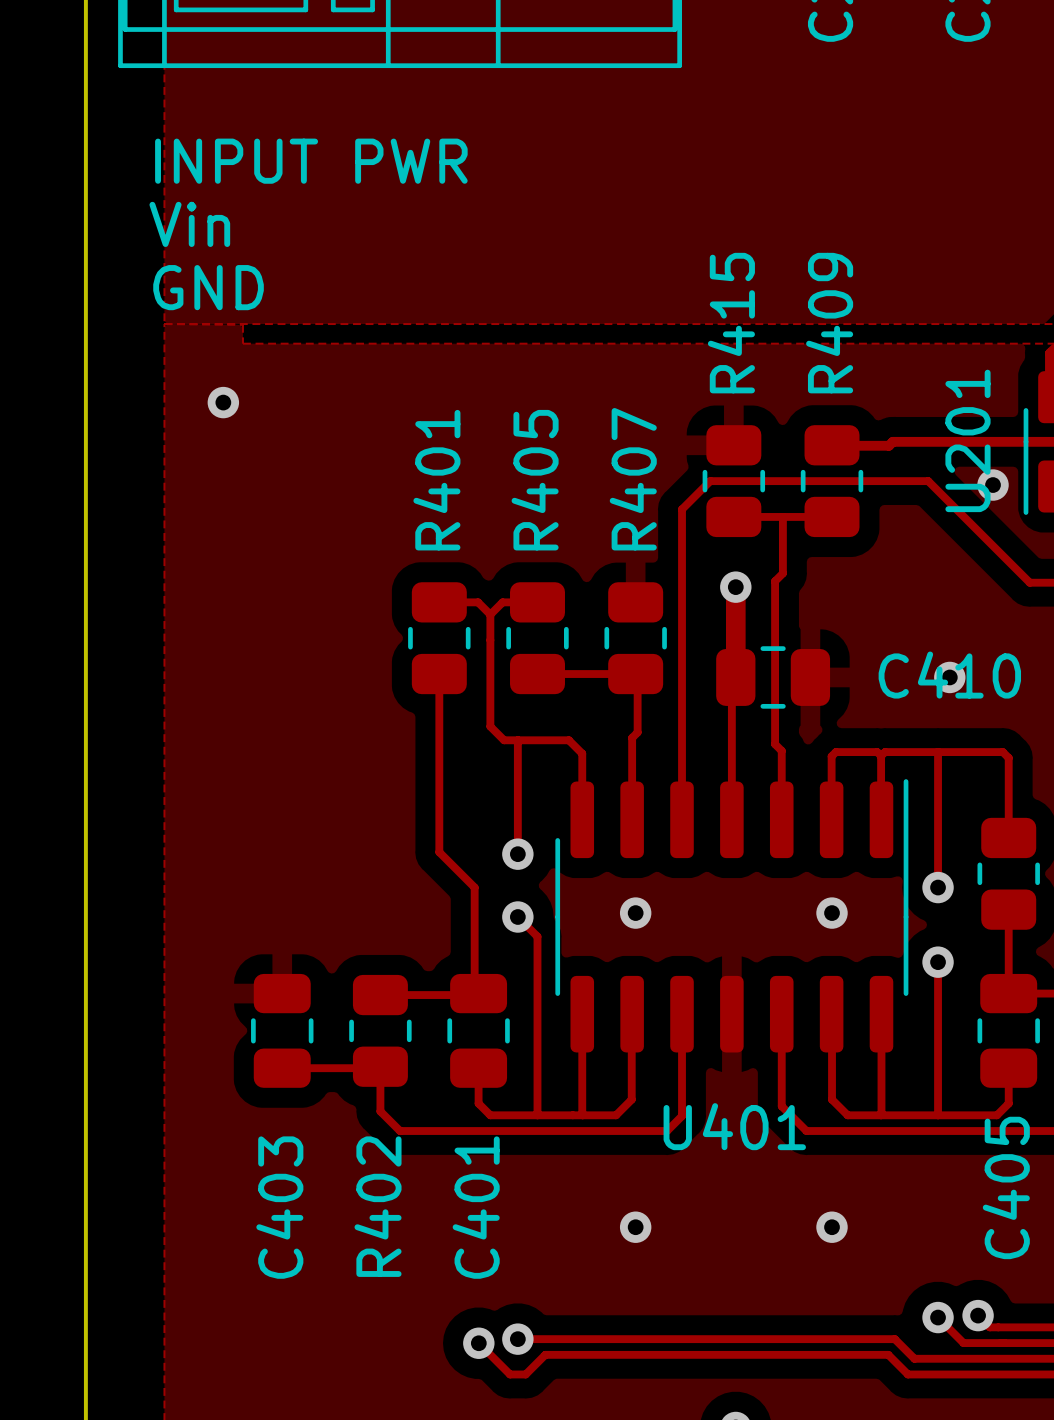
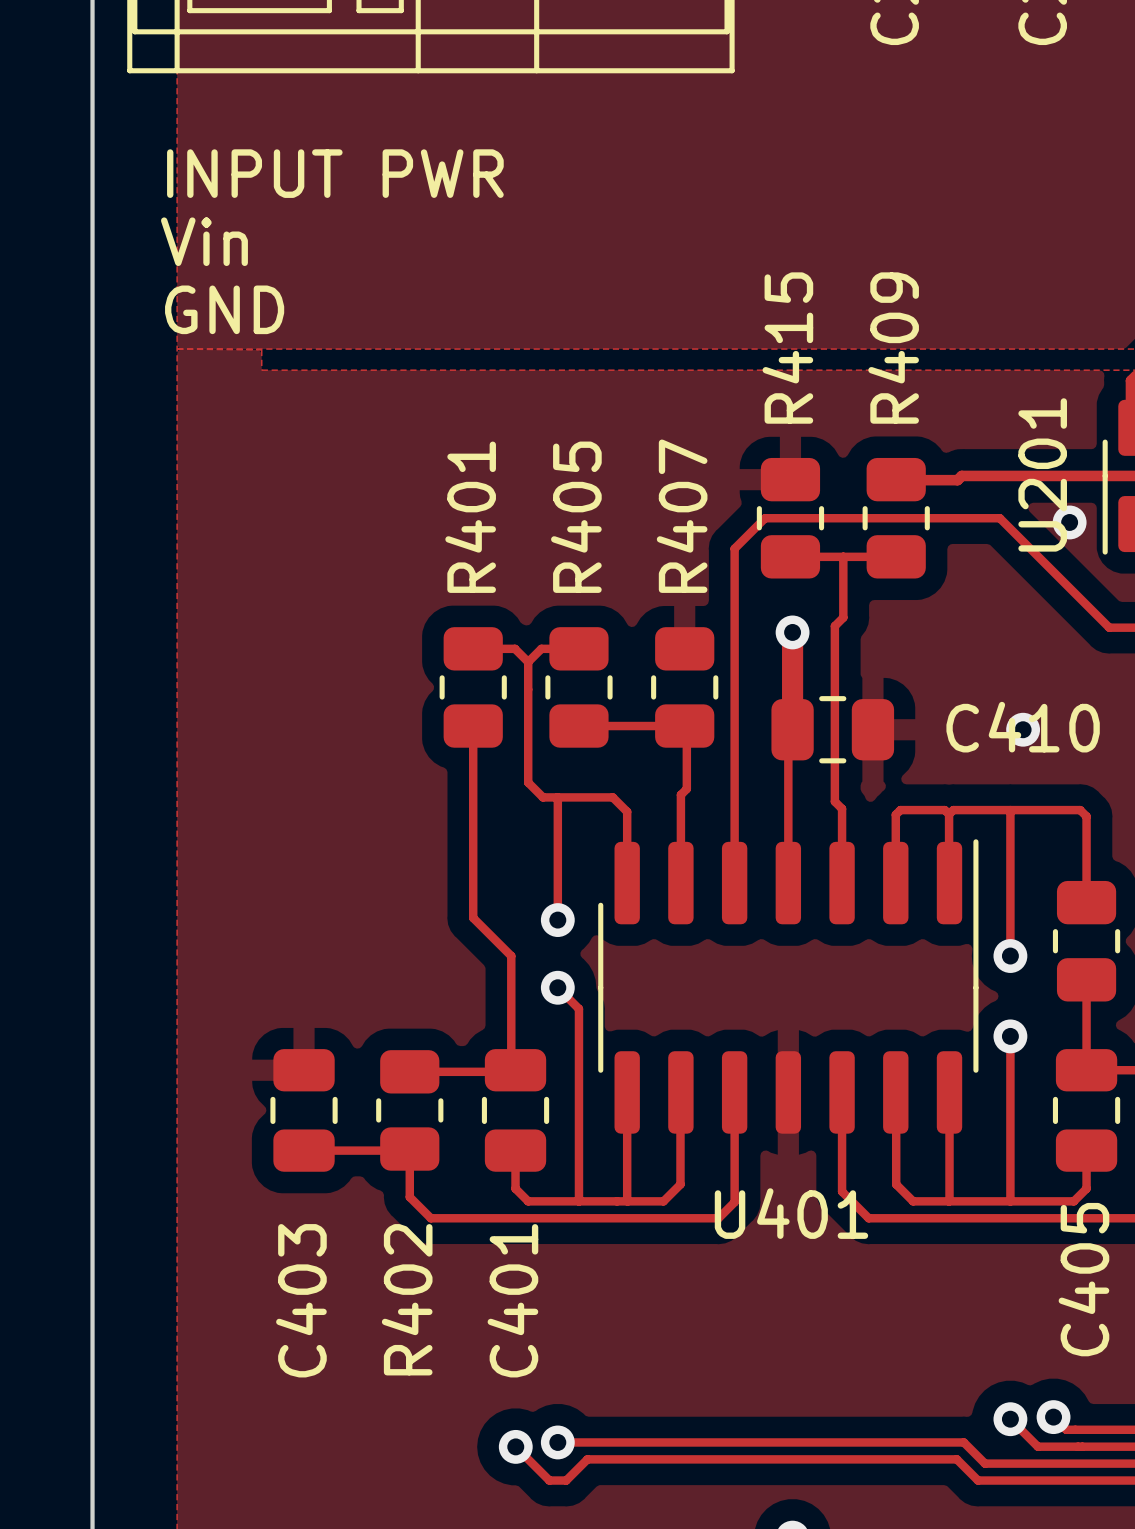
via: (223, 402) -> none
via: (635, 913) -> none
via: (832, 913) -> none
via: (635, 1227) -> none
via: (832, 1227) -> none

